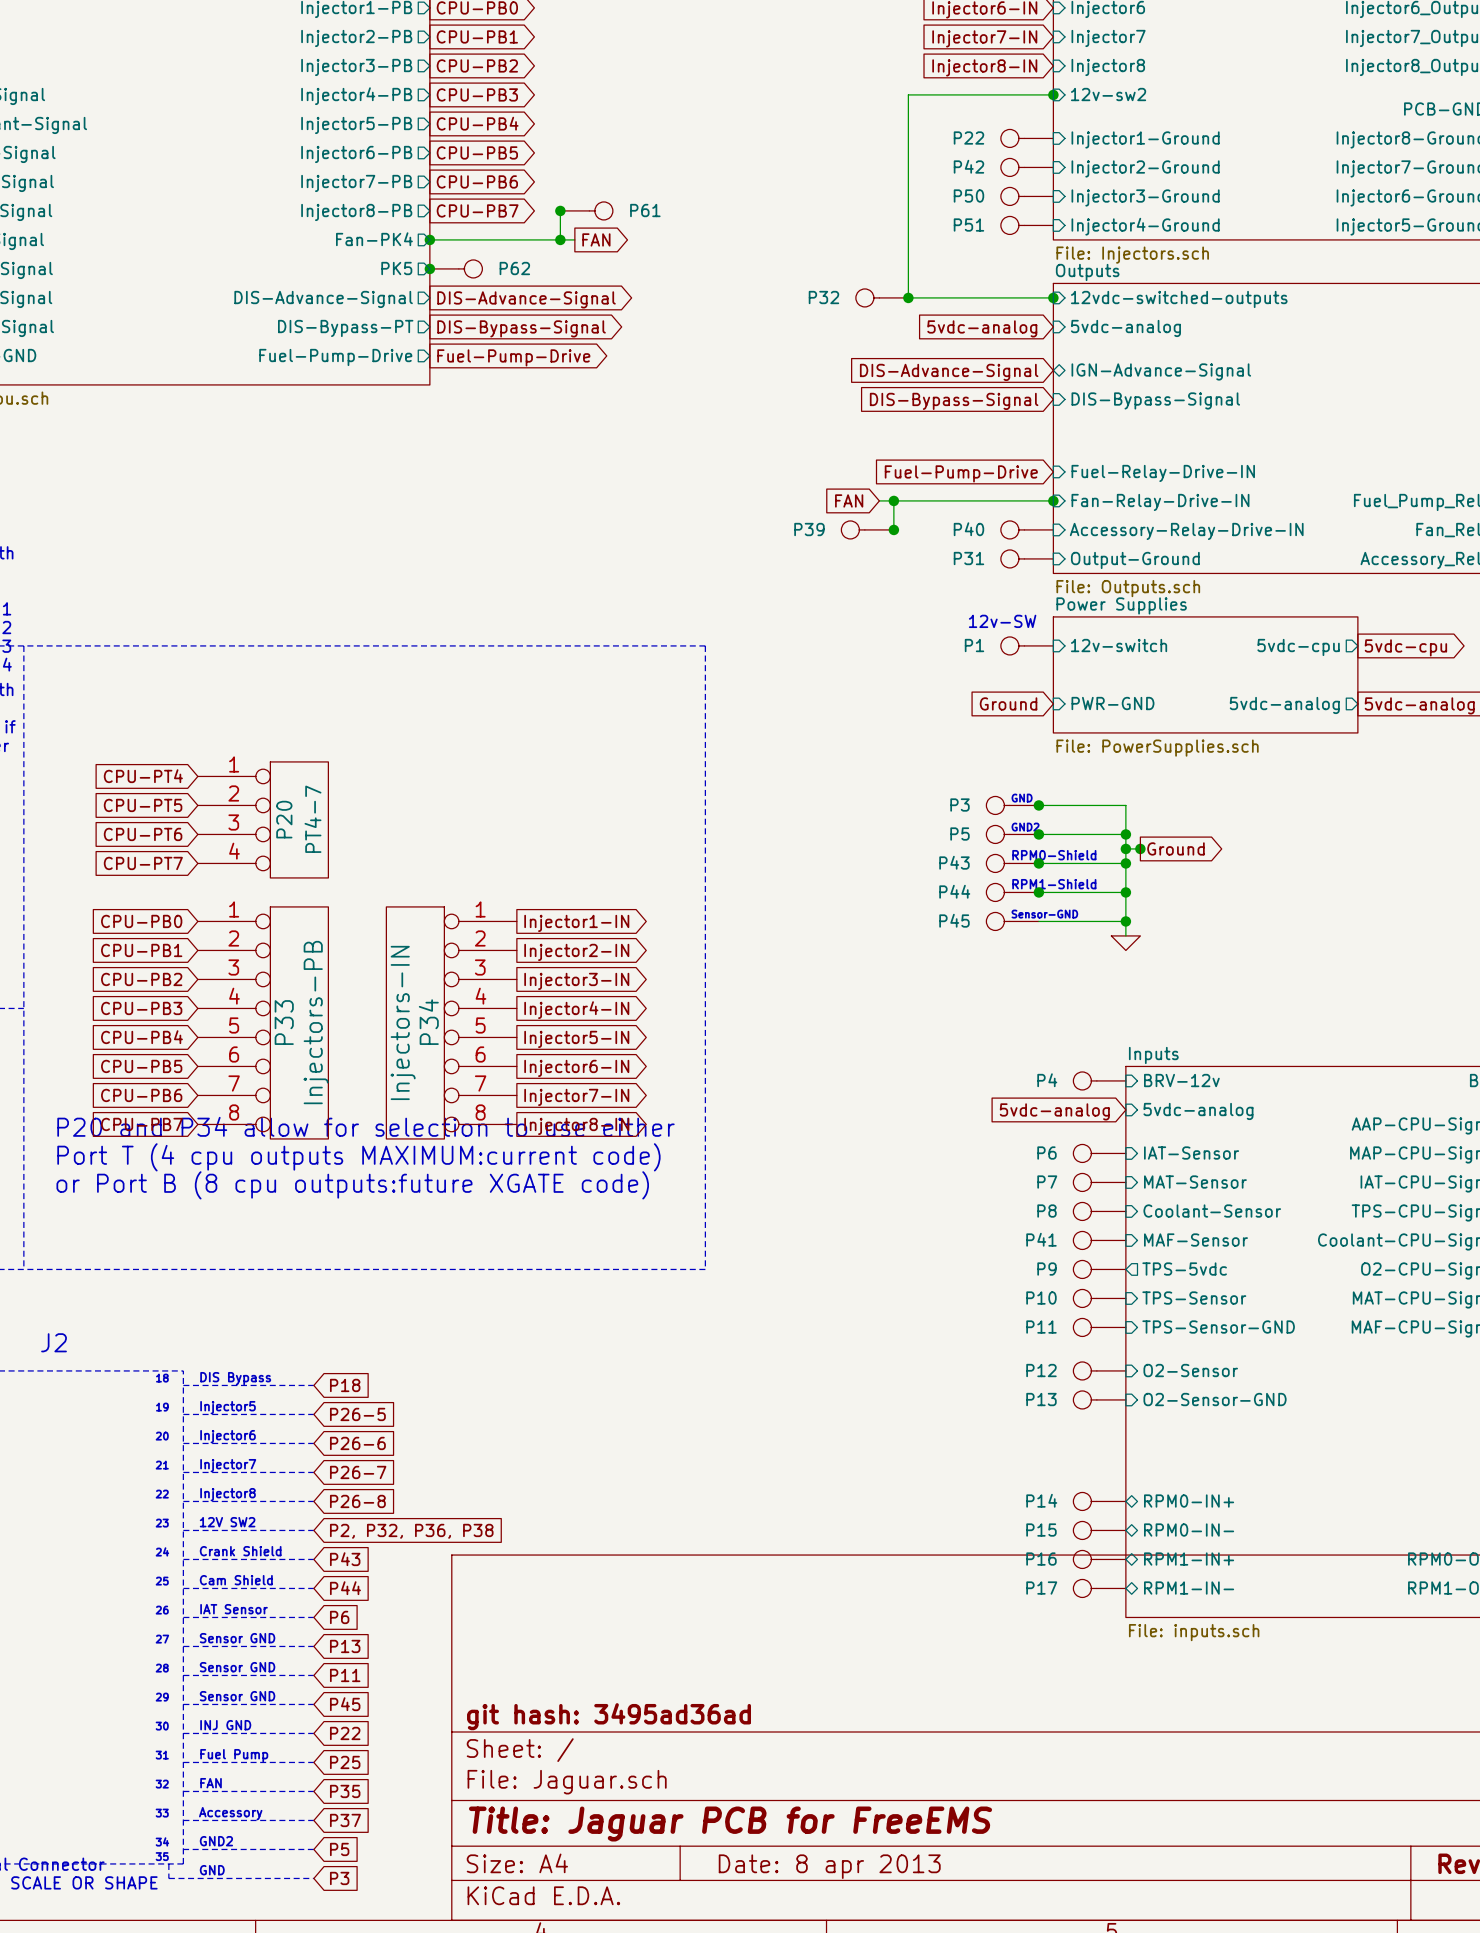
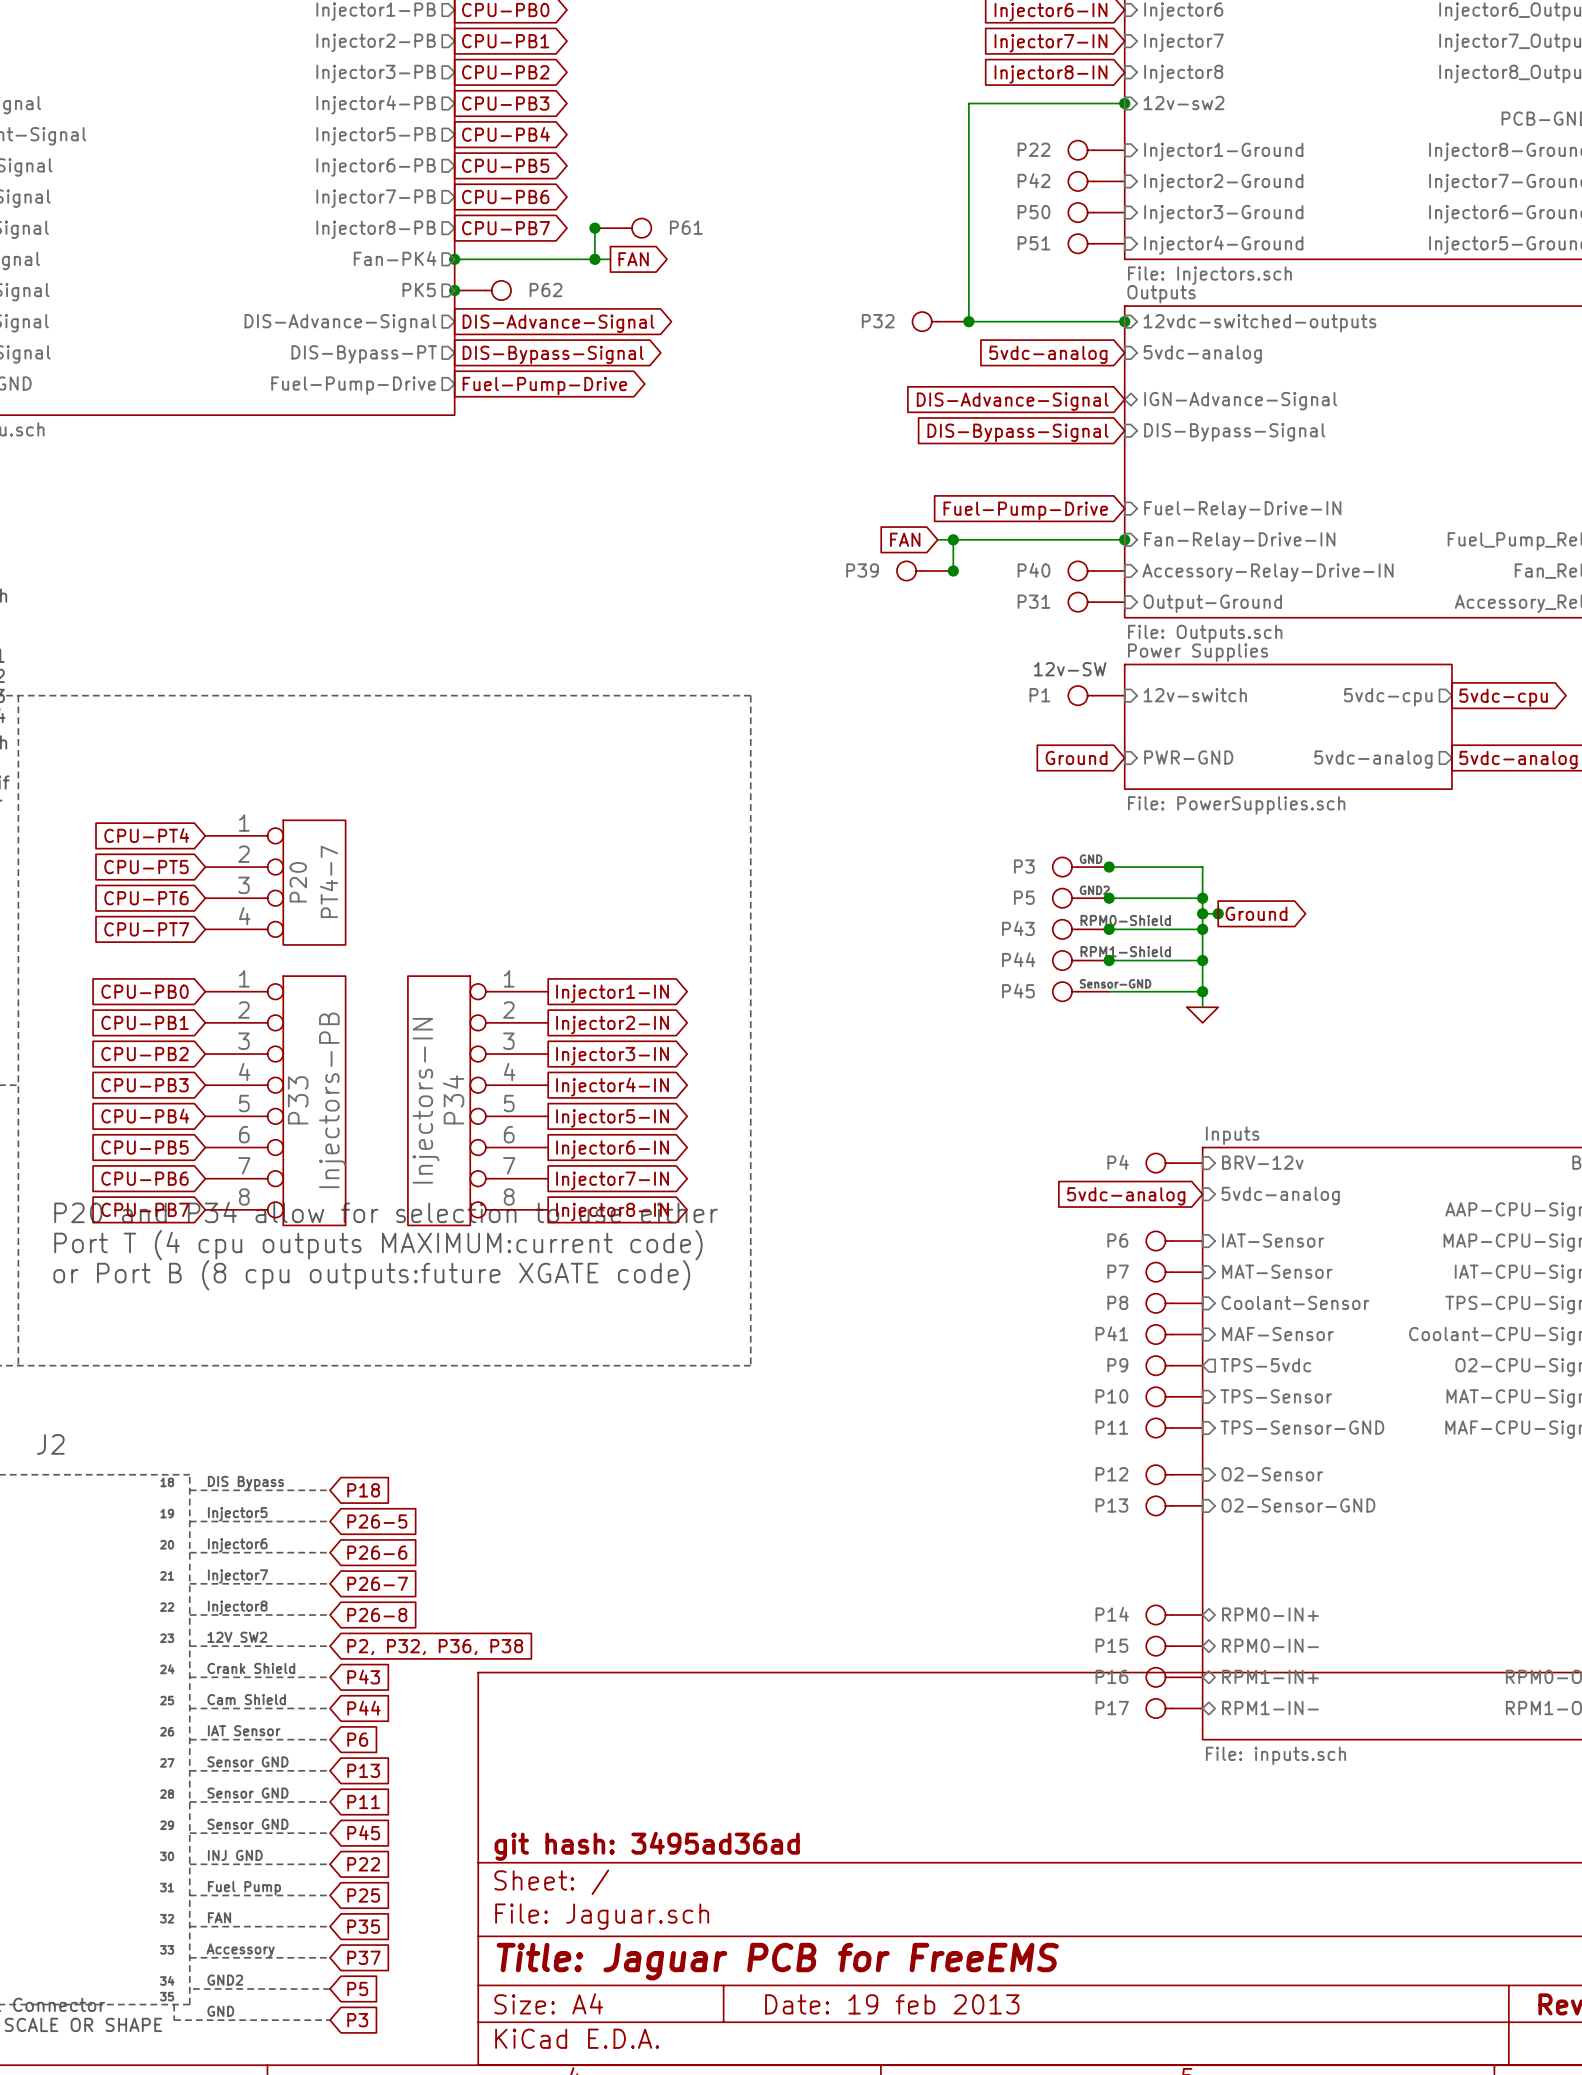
title block: Date: 8 apr 2013 (829, 1866) -> Date: 19 feb 2013 (892, 2004)

